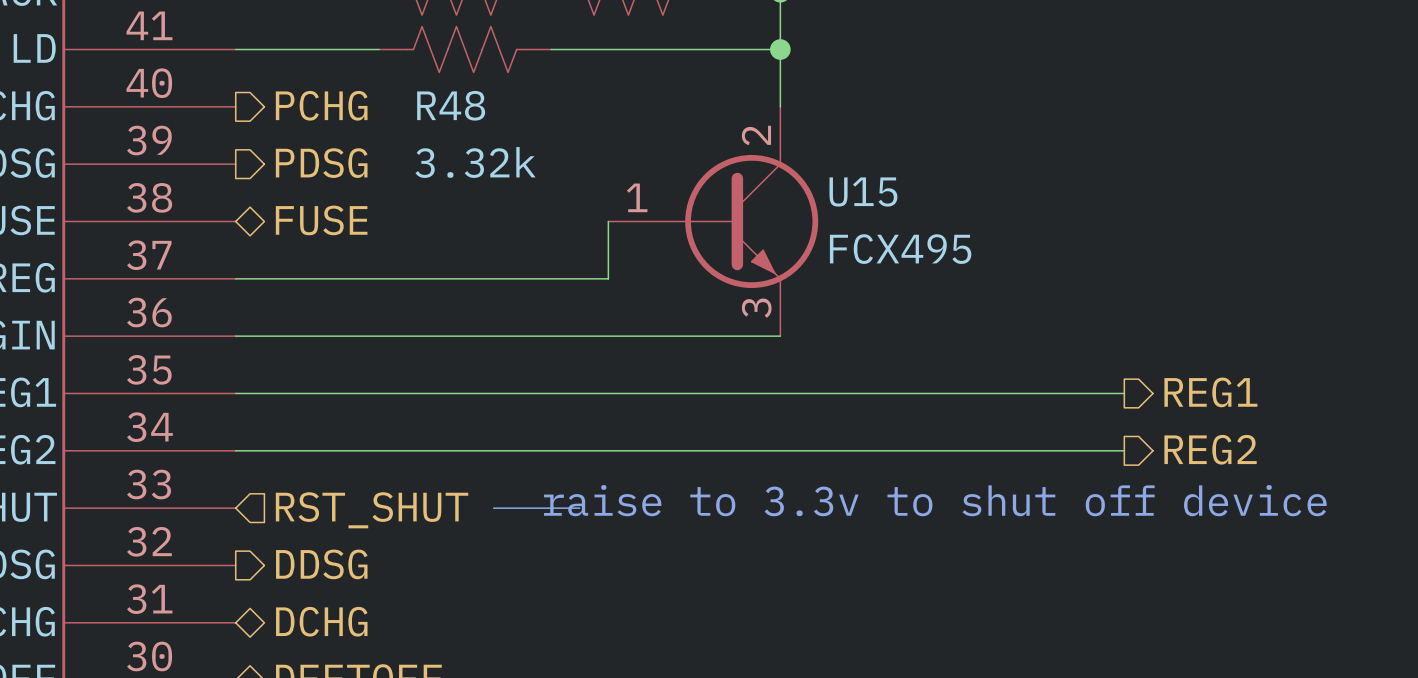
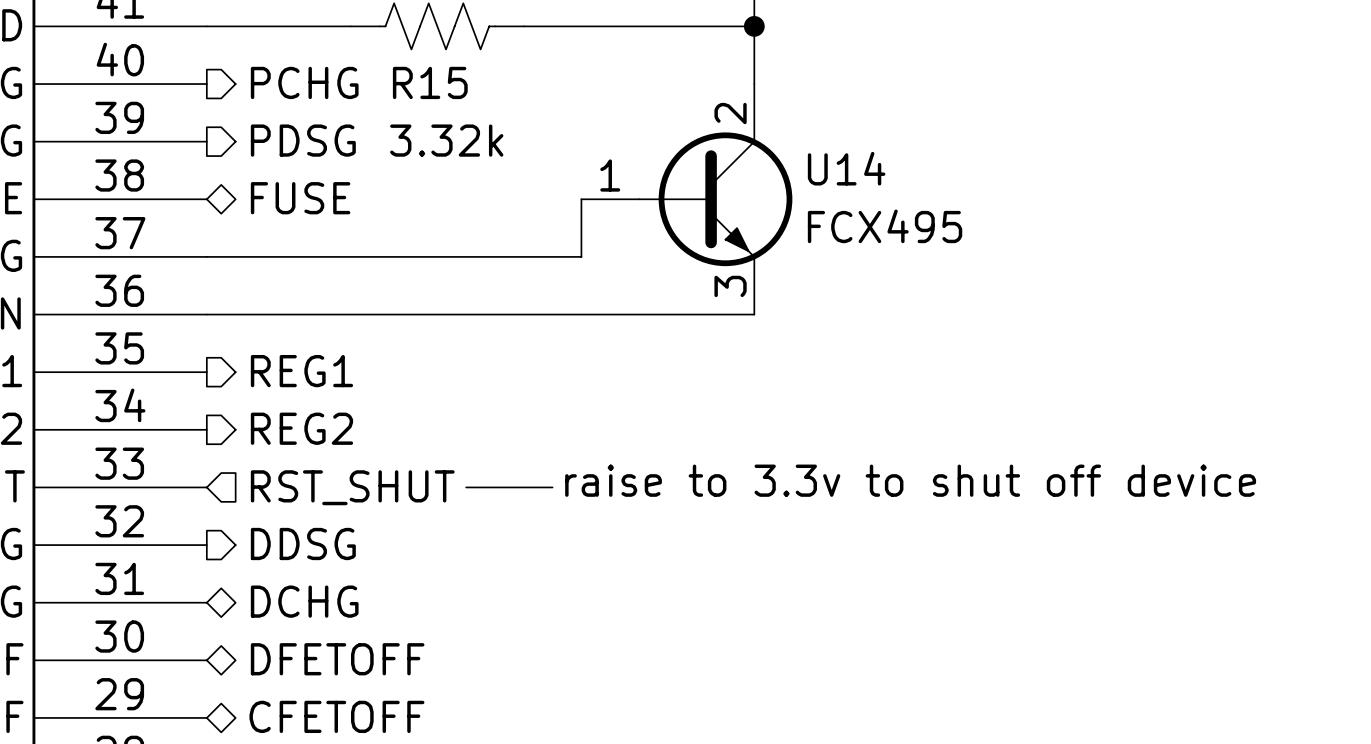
R48 name: R48 (451, 105) -> R15 (430, 82)
U15 name: U15 (863, 192) -> U14 (846, 168)
hierarchical label: none -> REG1 (301, 371)
hierarchical label: REG1 (1210, 392) -> none
wire: (235, 393) (1124, 393) -> none
hierarchical label: none -> REG2 (301, 428)
hierarchical label: REG2 (1210, 449) -> none
wire: (235, 450) (1124, 450) -> none

